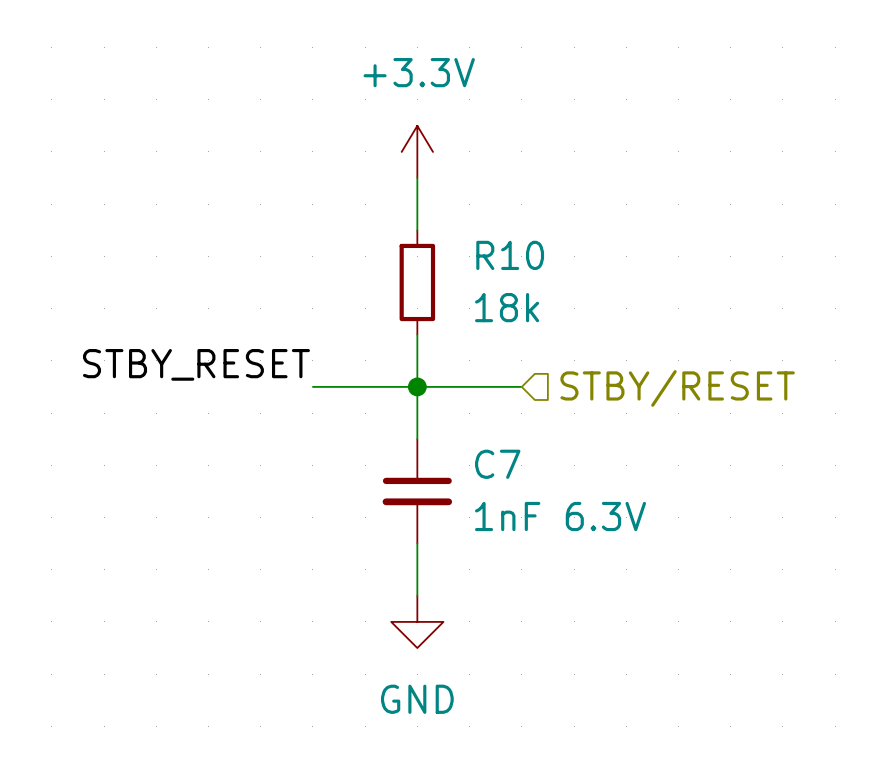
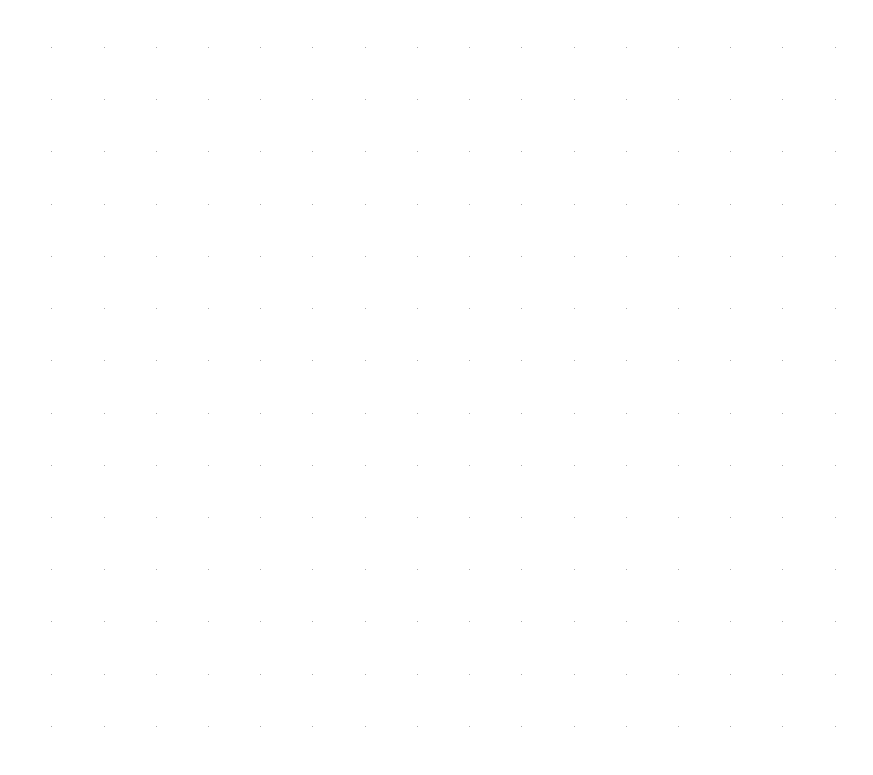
power symbol: +3.3V (417, 151) -> none
wire: (417, 178) (417, 230) -> none
R10: 18k (417, 282) -> none
wire: (417, 334) (417, 439) -> none
label: STBY_RESET (196, 364) -> none
wire: (312, 386) (521, 386) -> none
junction: (417, 386) -> none
hierarchical label: STBY/RESET (677, 388) -> none
C7: 1nF 6.3V (417, 491) -> none
wire: (417, 543) (417, 595) -> none
power symbol: GND (417, 621) -> none

